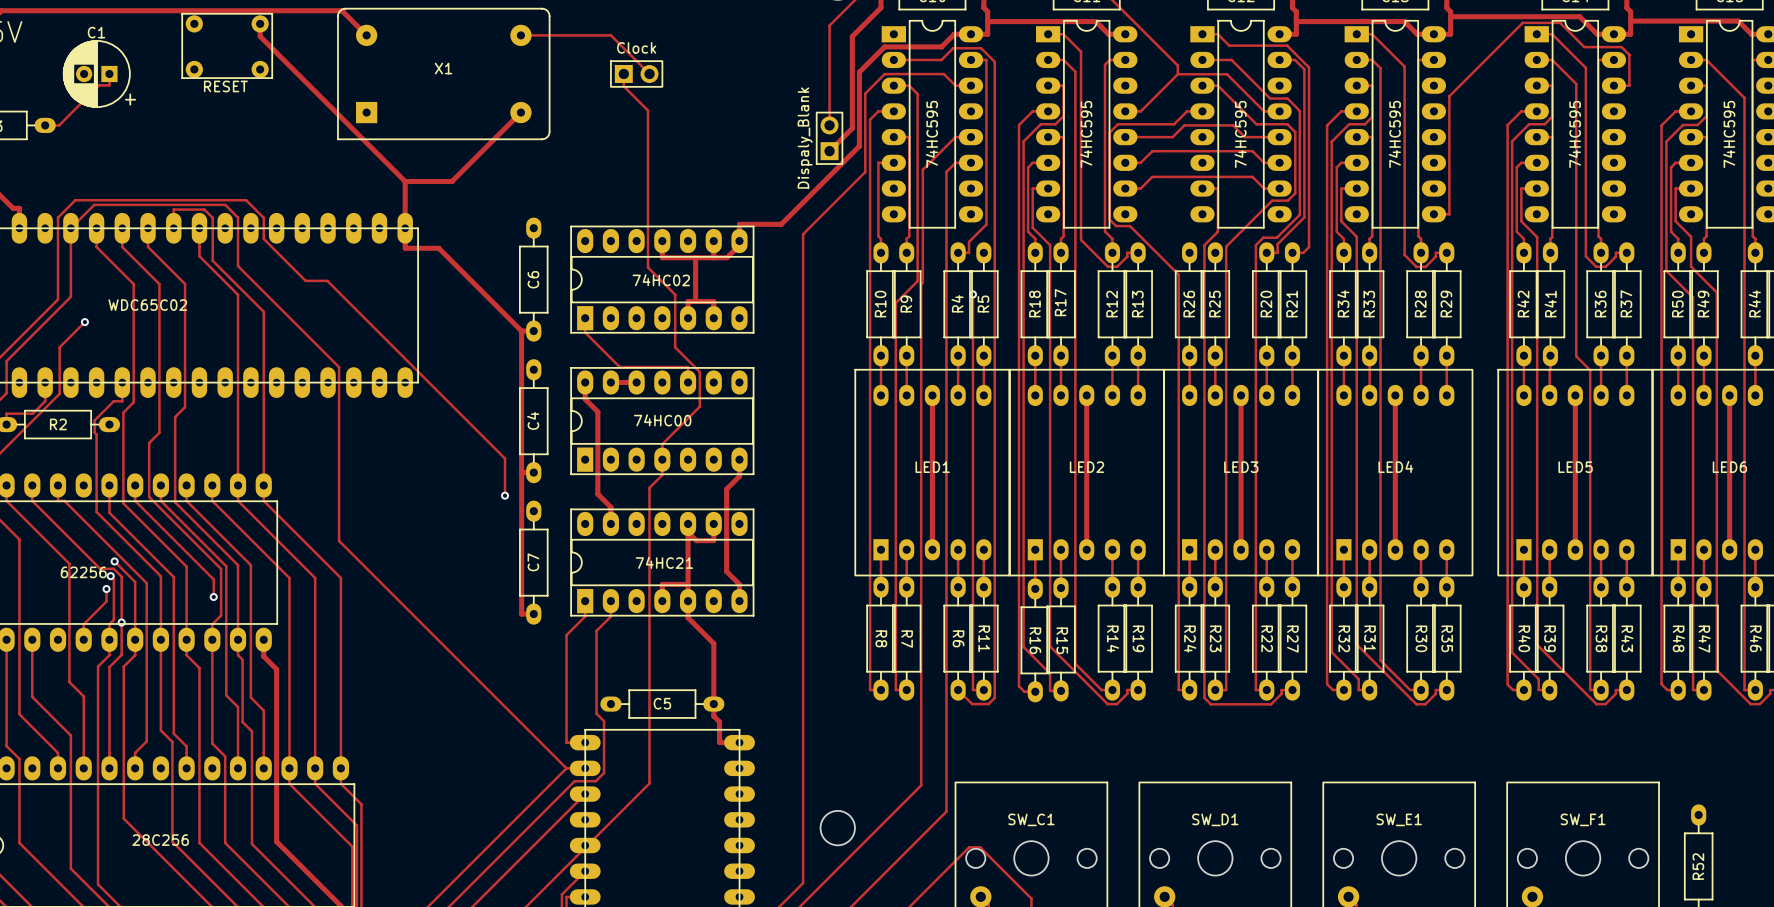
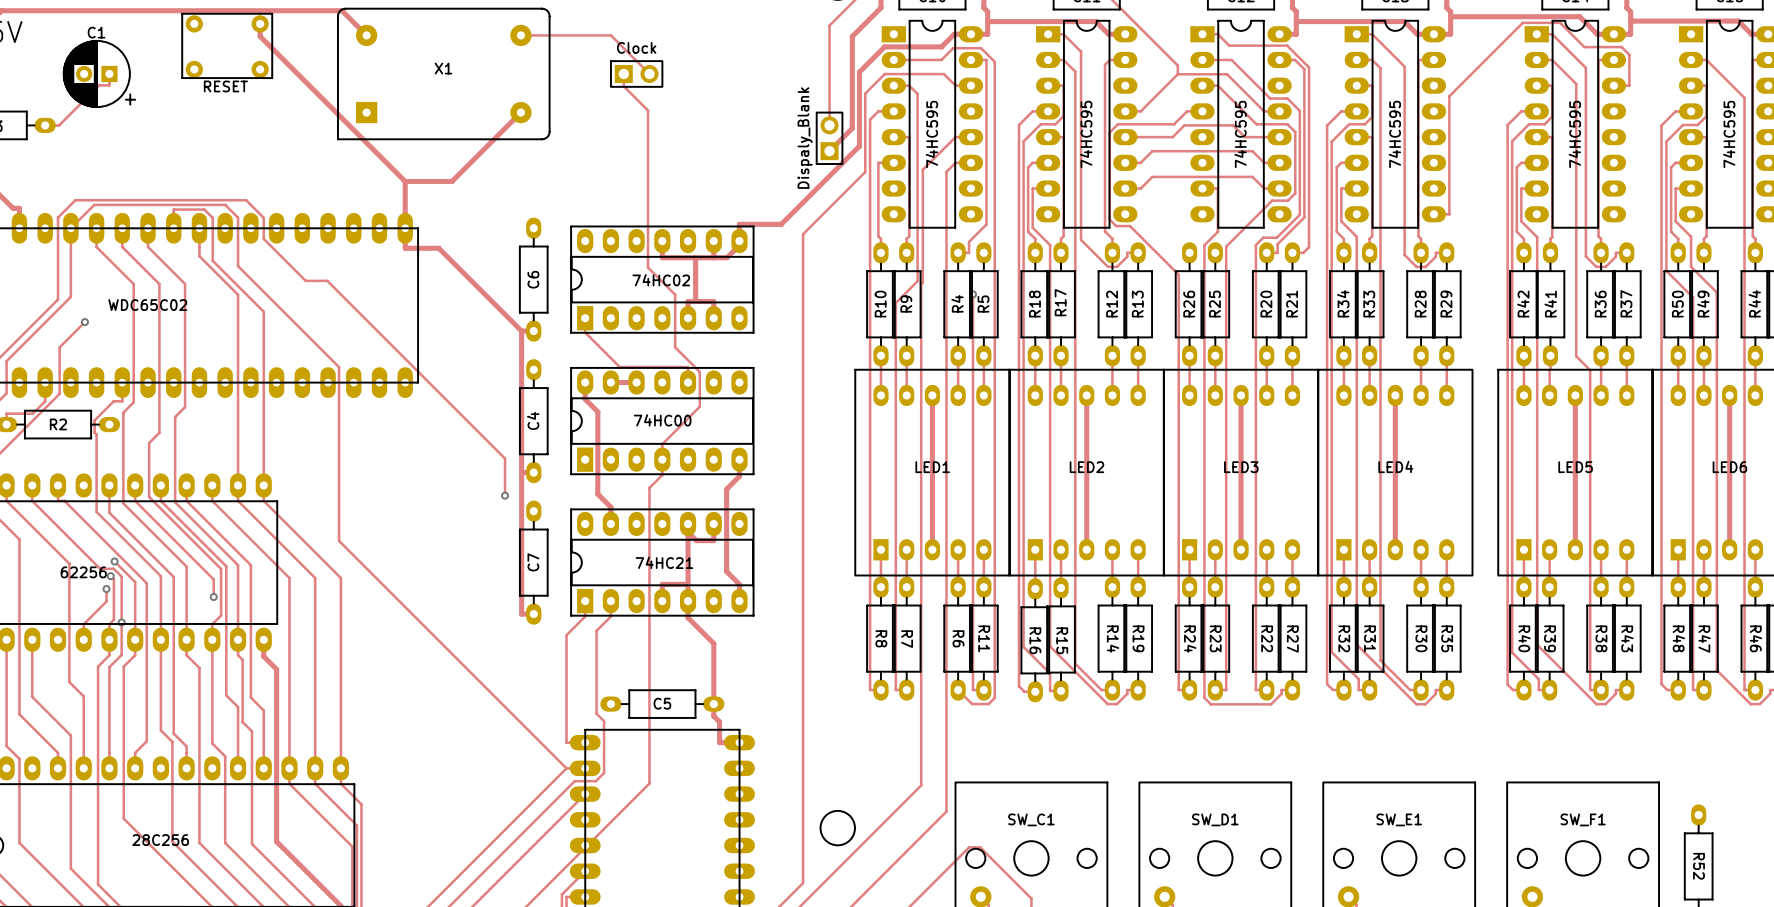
R52 name rotation: 0° (1698, 866) -> 180° (1698, 866)

